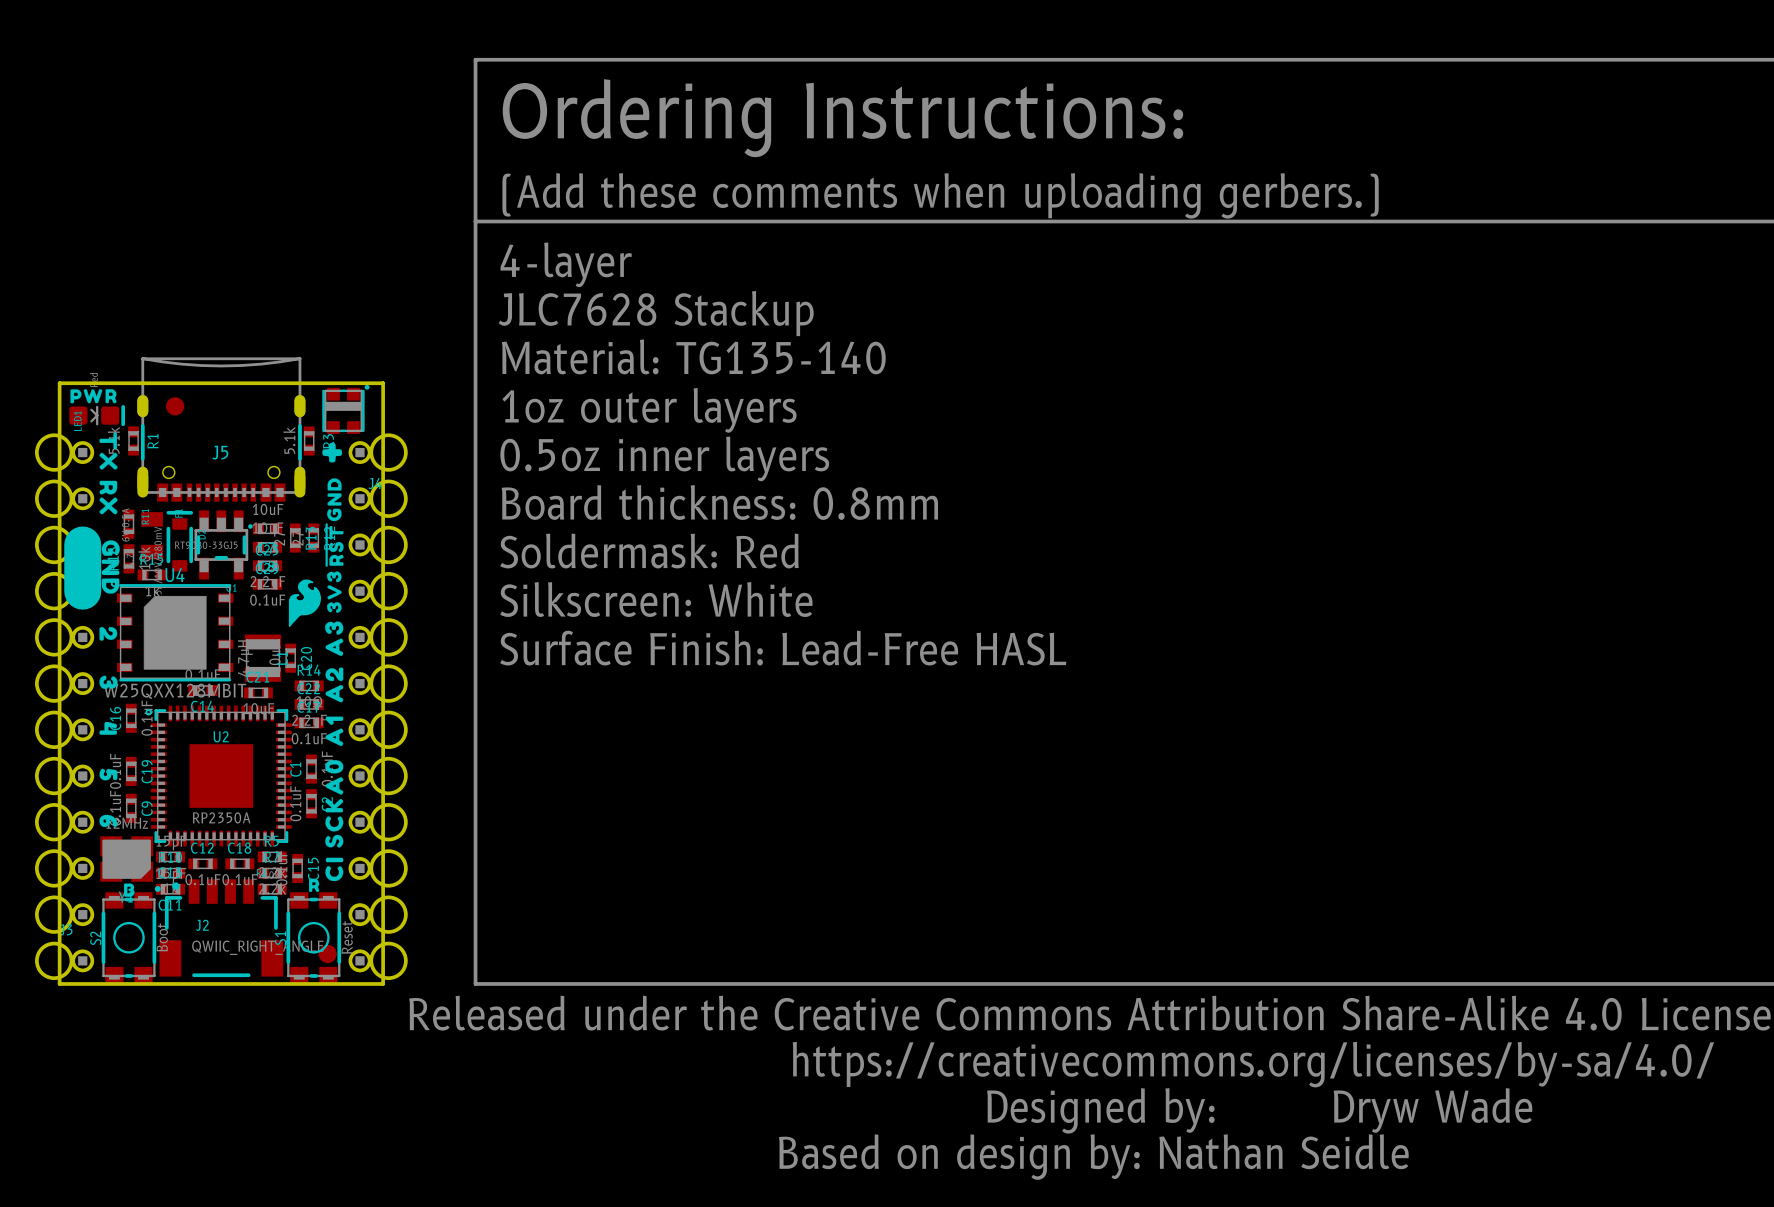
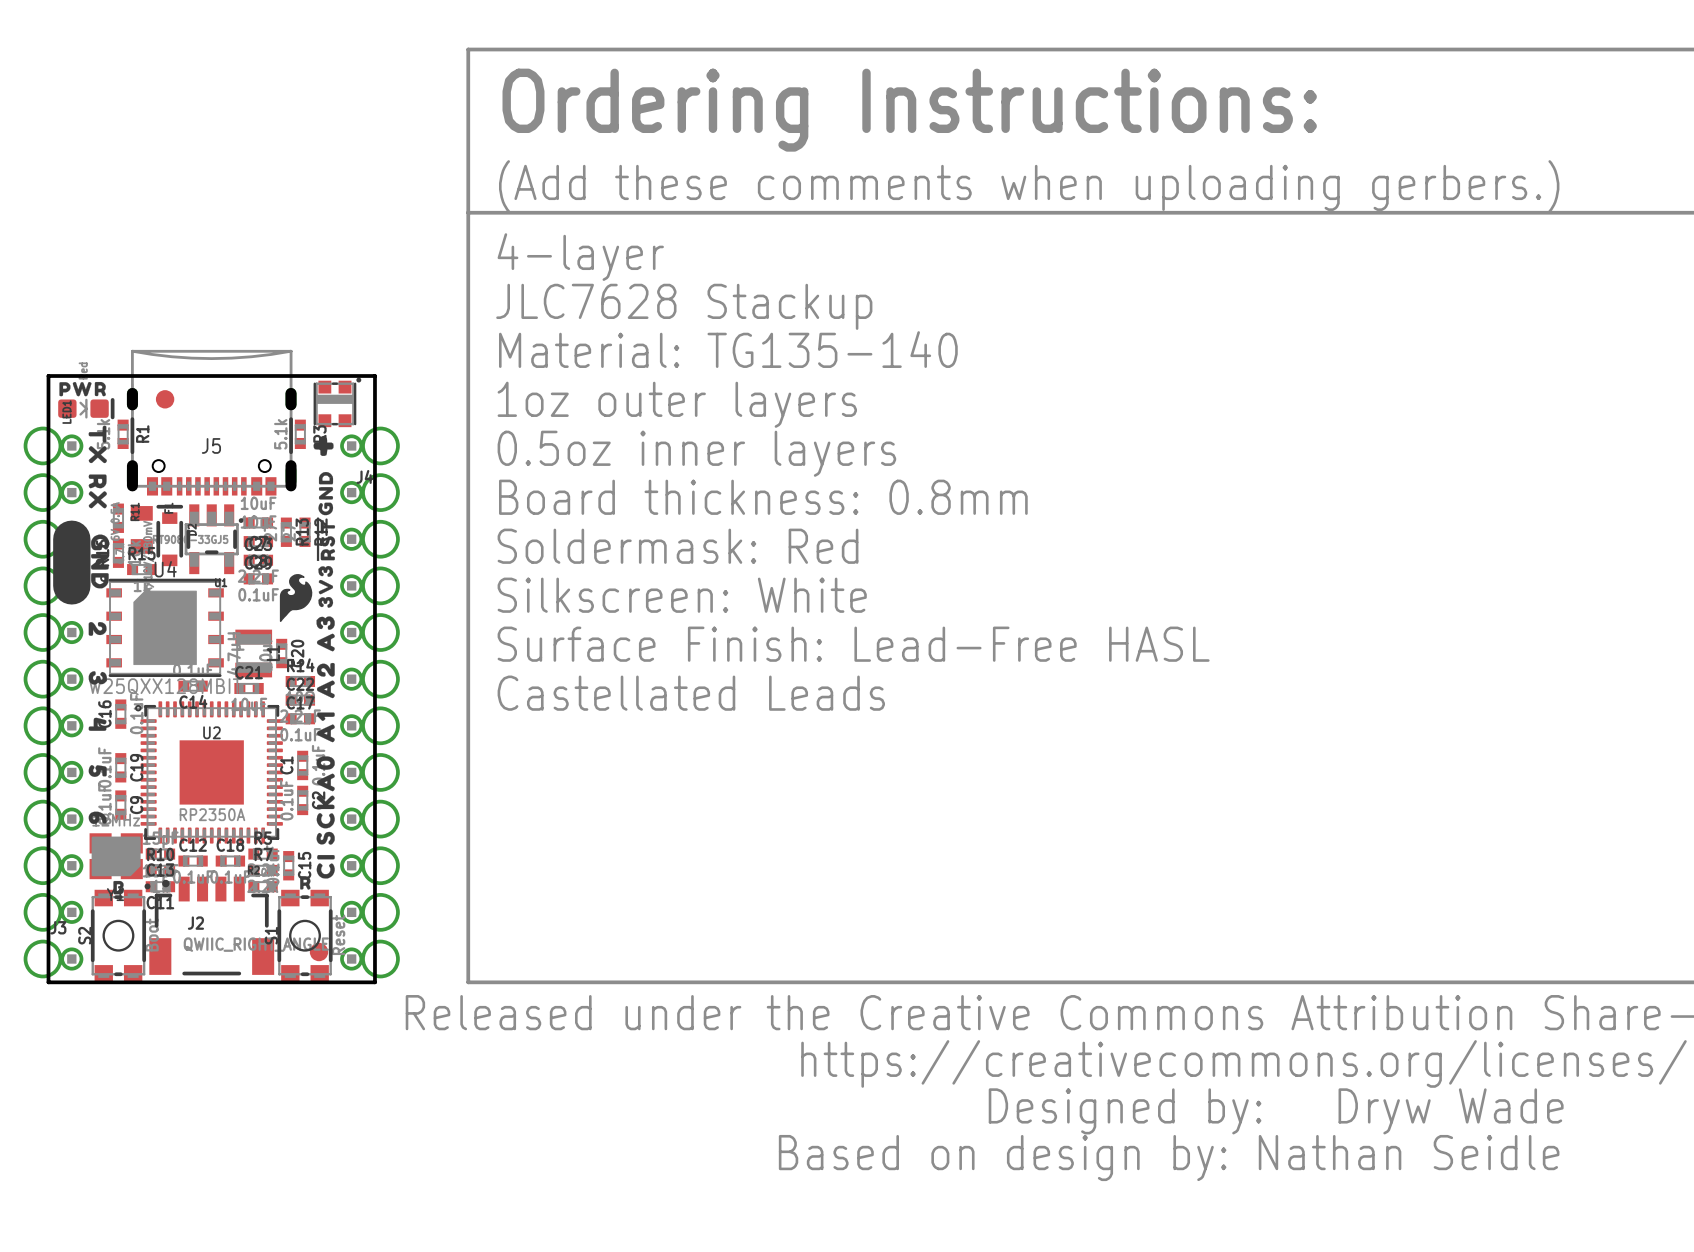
text: none -> Castellated Leads (691, 693)

